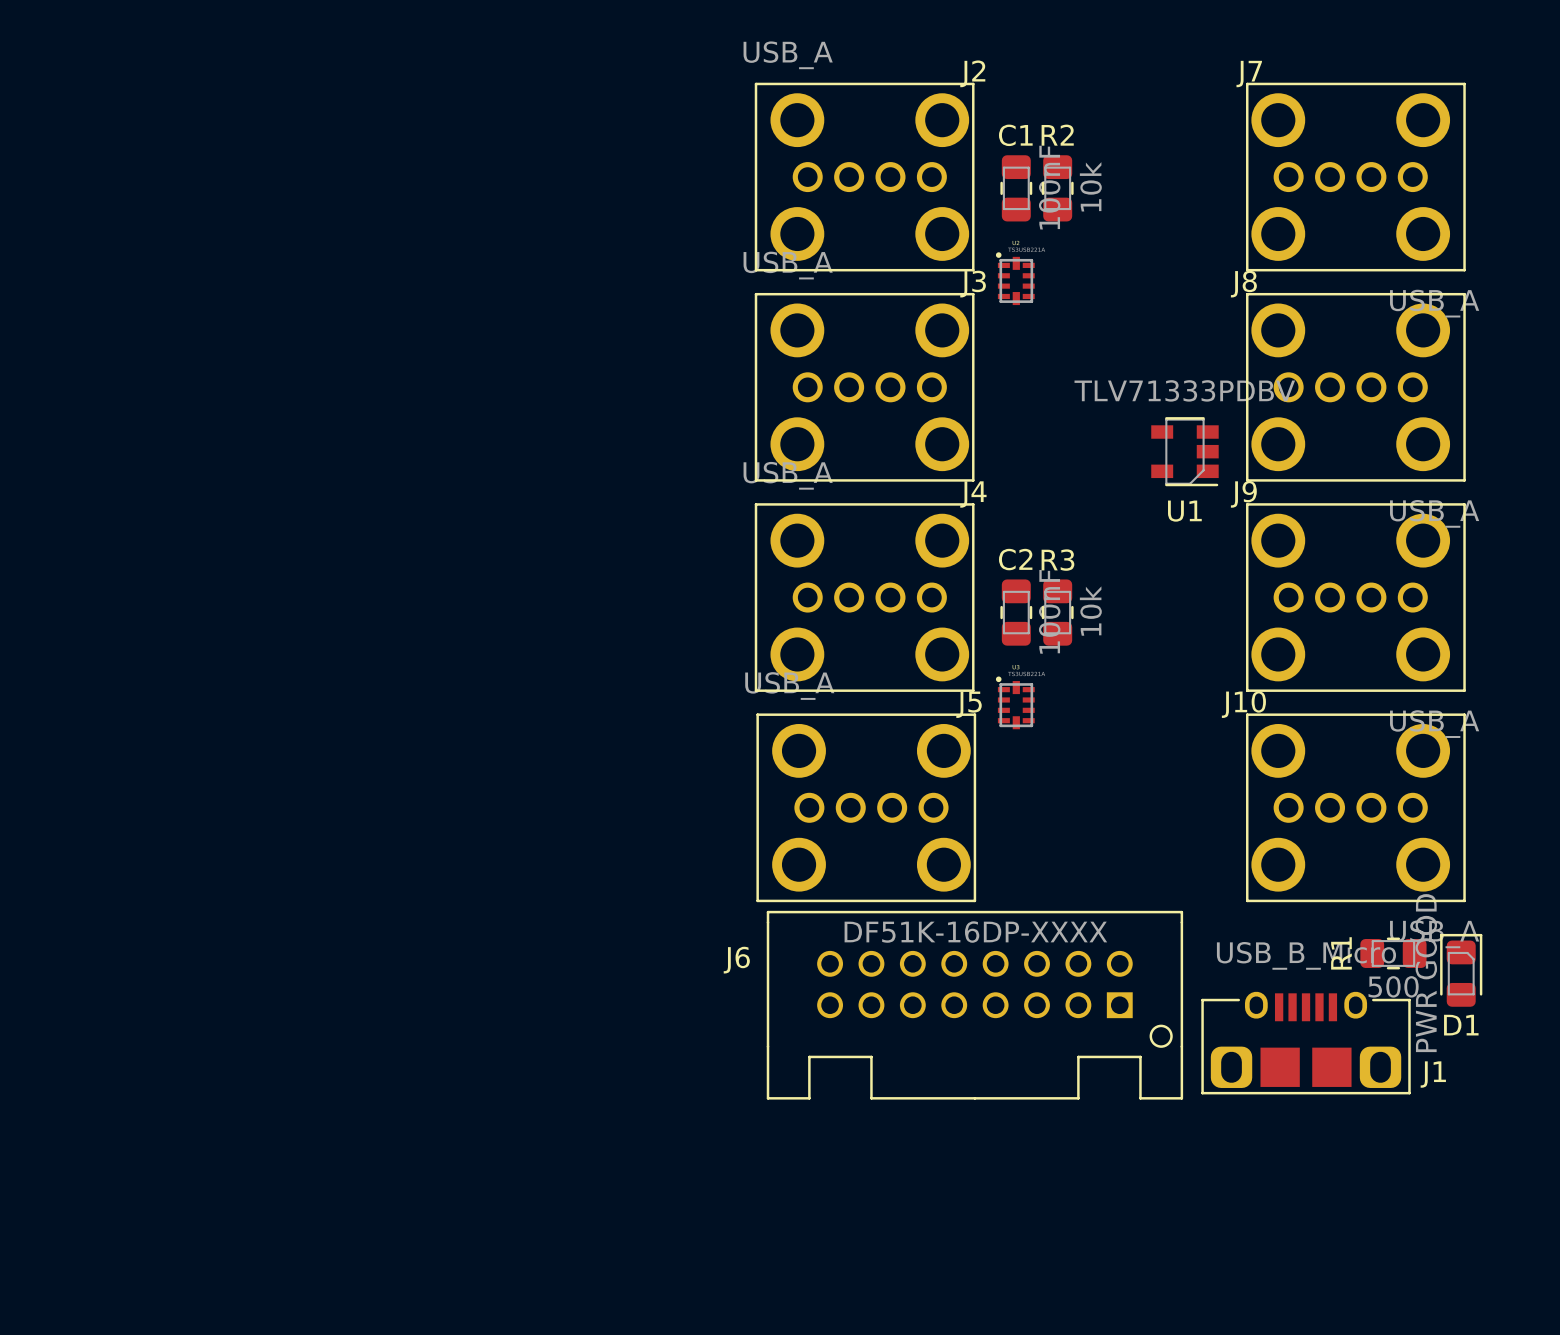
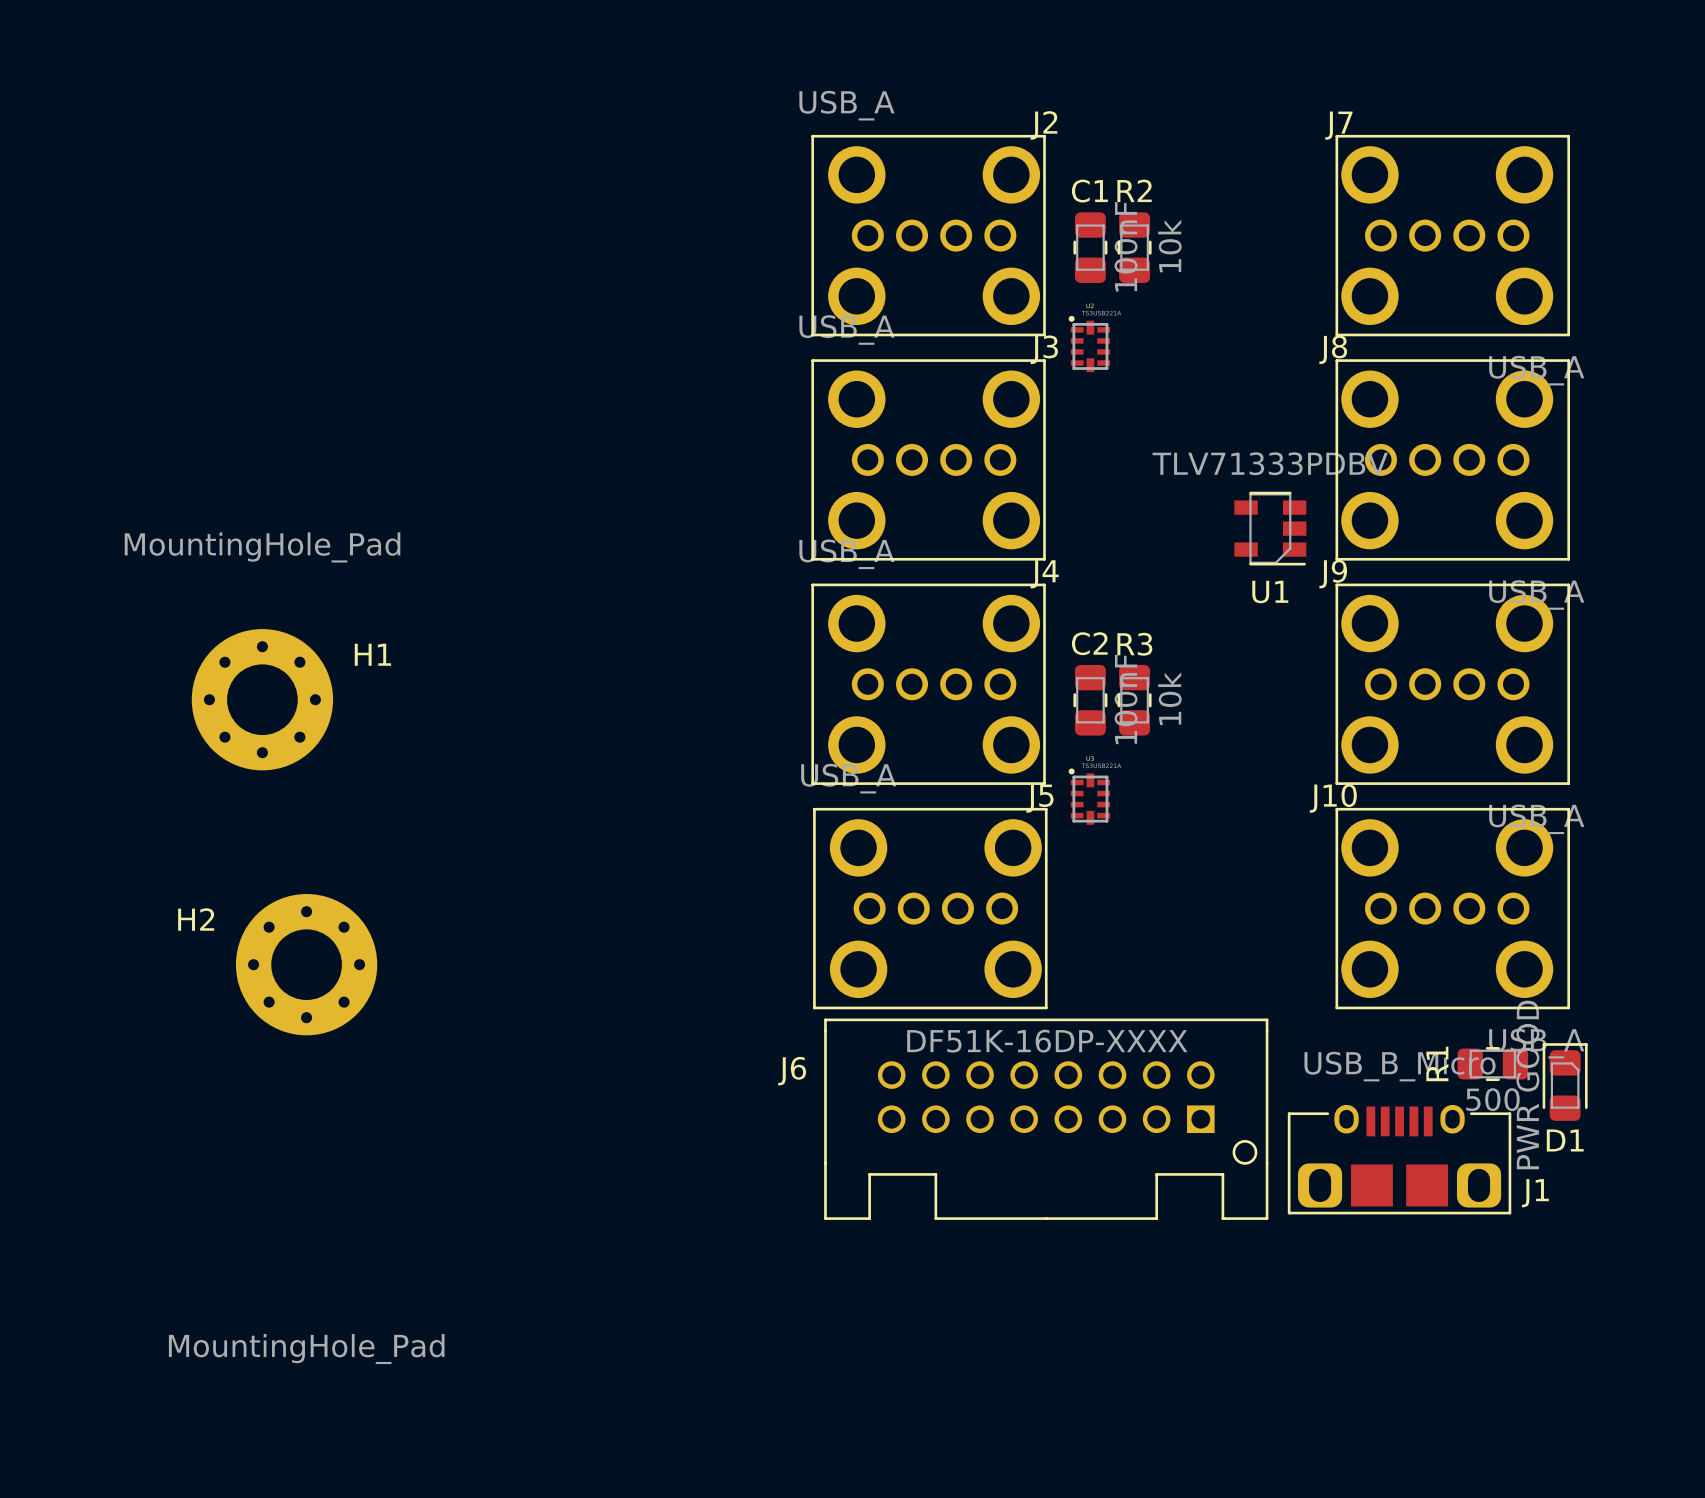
H1: none -> MountingHole_Pad (262, 699)
H2: none -> MountingHole_Pad (306, 964)

